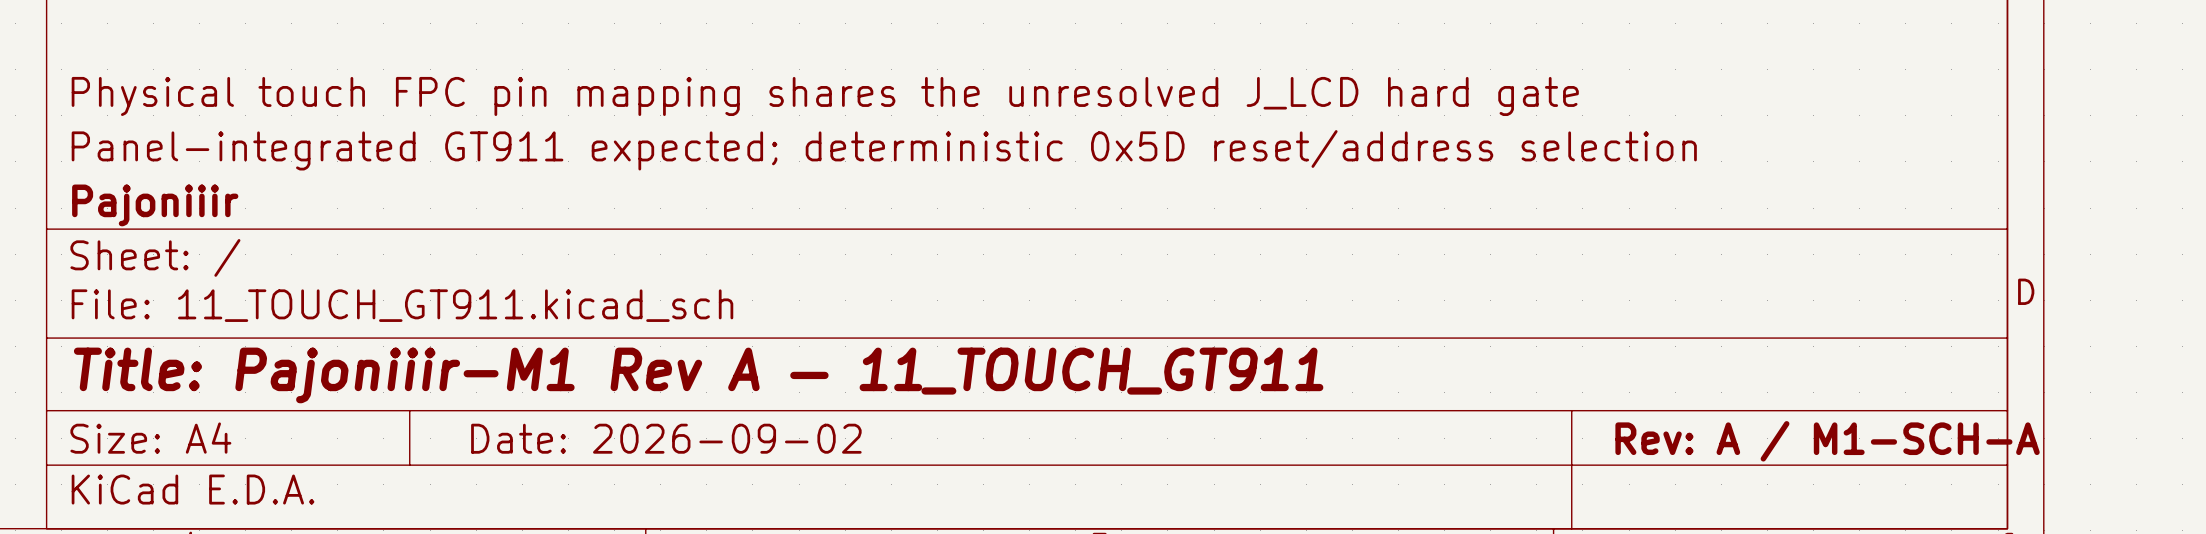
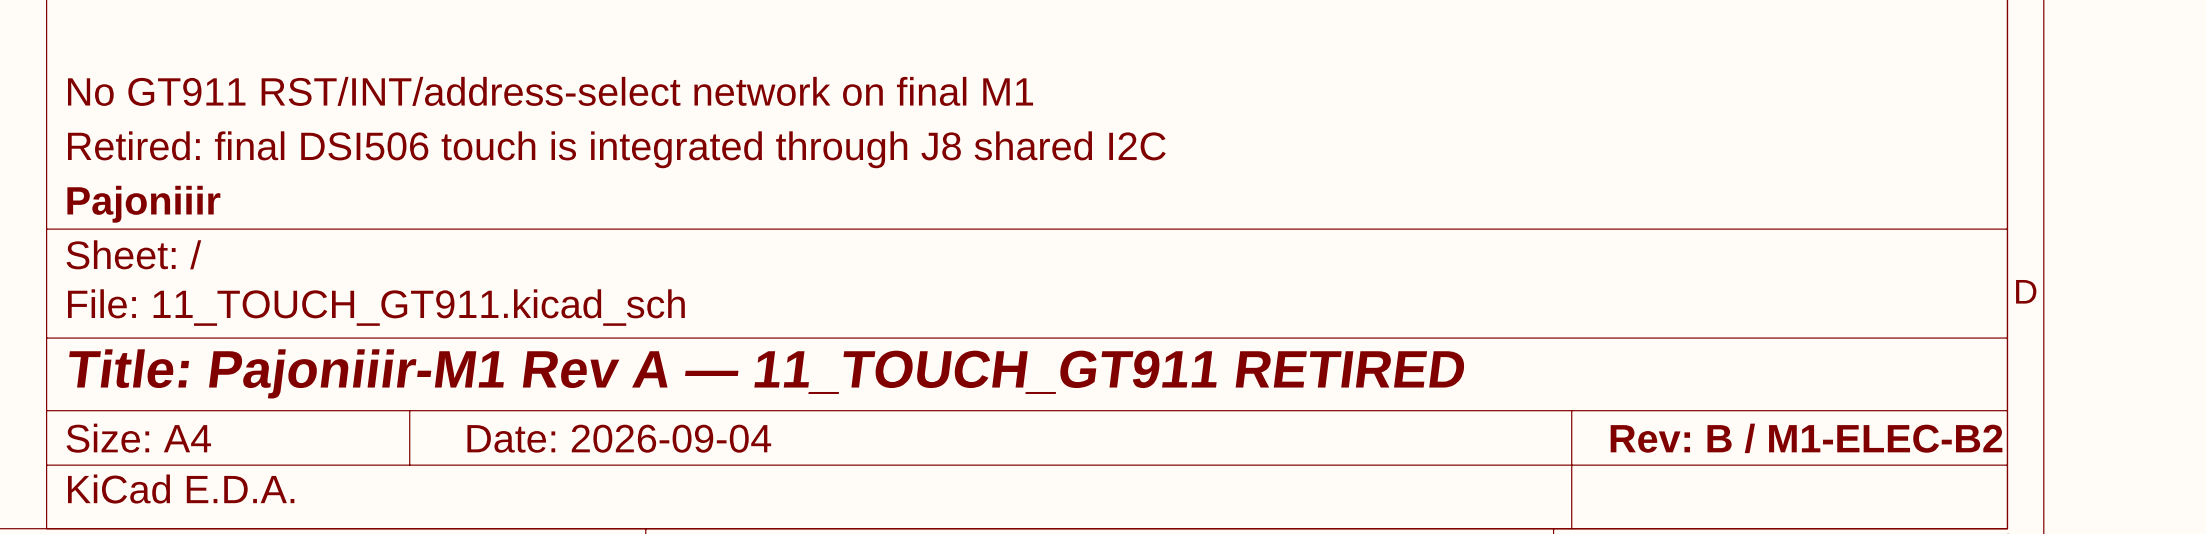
title block: Physical touch FPC pin mapping shares the unresolved J_LCD hard gate (825, 96) -> No GT911 RST/INT/address-select network on final M1 (550, 91)
title block: Panel-integrated GT911 expected; deterministic 0x5D reset/address selection (884, 150) -> Retired: final DSI506 touch is integrated through J8 shared I2C (616, 149)
title block: Title: Pajoniiir-M1 Rev A — 11_TOUCH_GT911 (698, 375) -> Title: Pajoniiir-M1 Rev A — 11_TOUCH_GT911 RETIRED (767, 373)
title block: Date: 2026-09-02 (666, 438) -> Date: 2026-09-04 (619, 438)
title block: Rev: A / M1-SCH-A (1827, 441) -> Rev: B / M1-ELEC-B2 (1806, 438)

